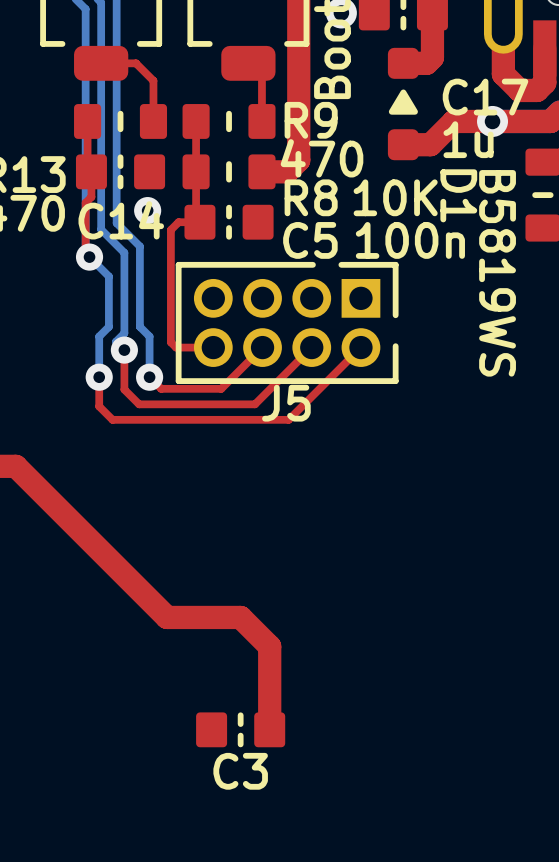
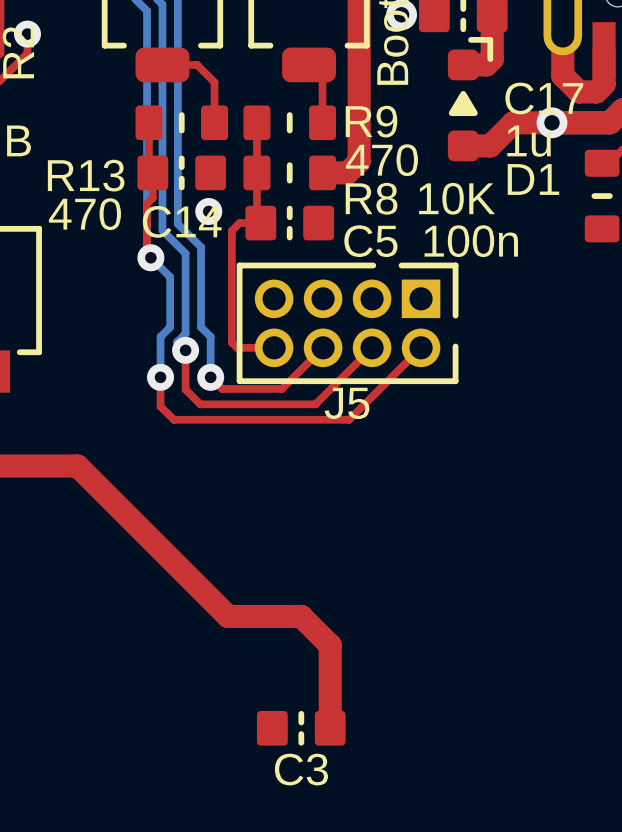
D1 footprint: [387, 47, 419, 161] -> [447, 36, 494, 162]
D1 value: B5819WS (497, 273) -> none

